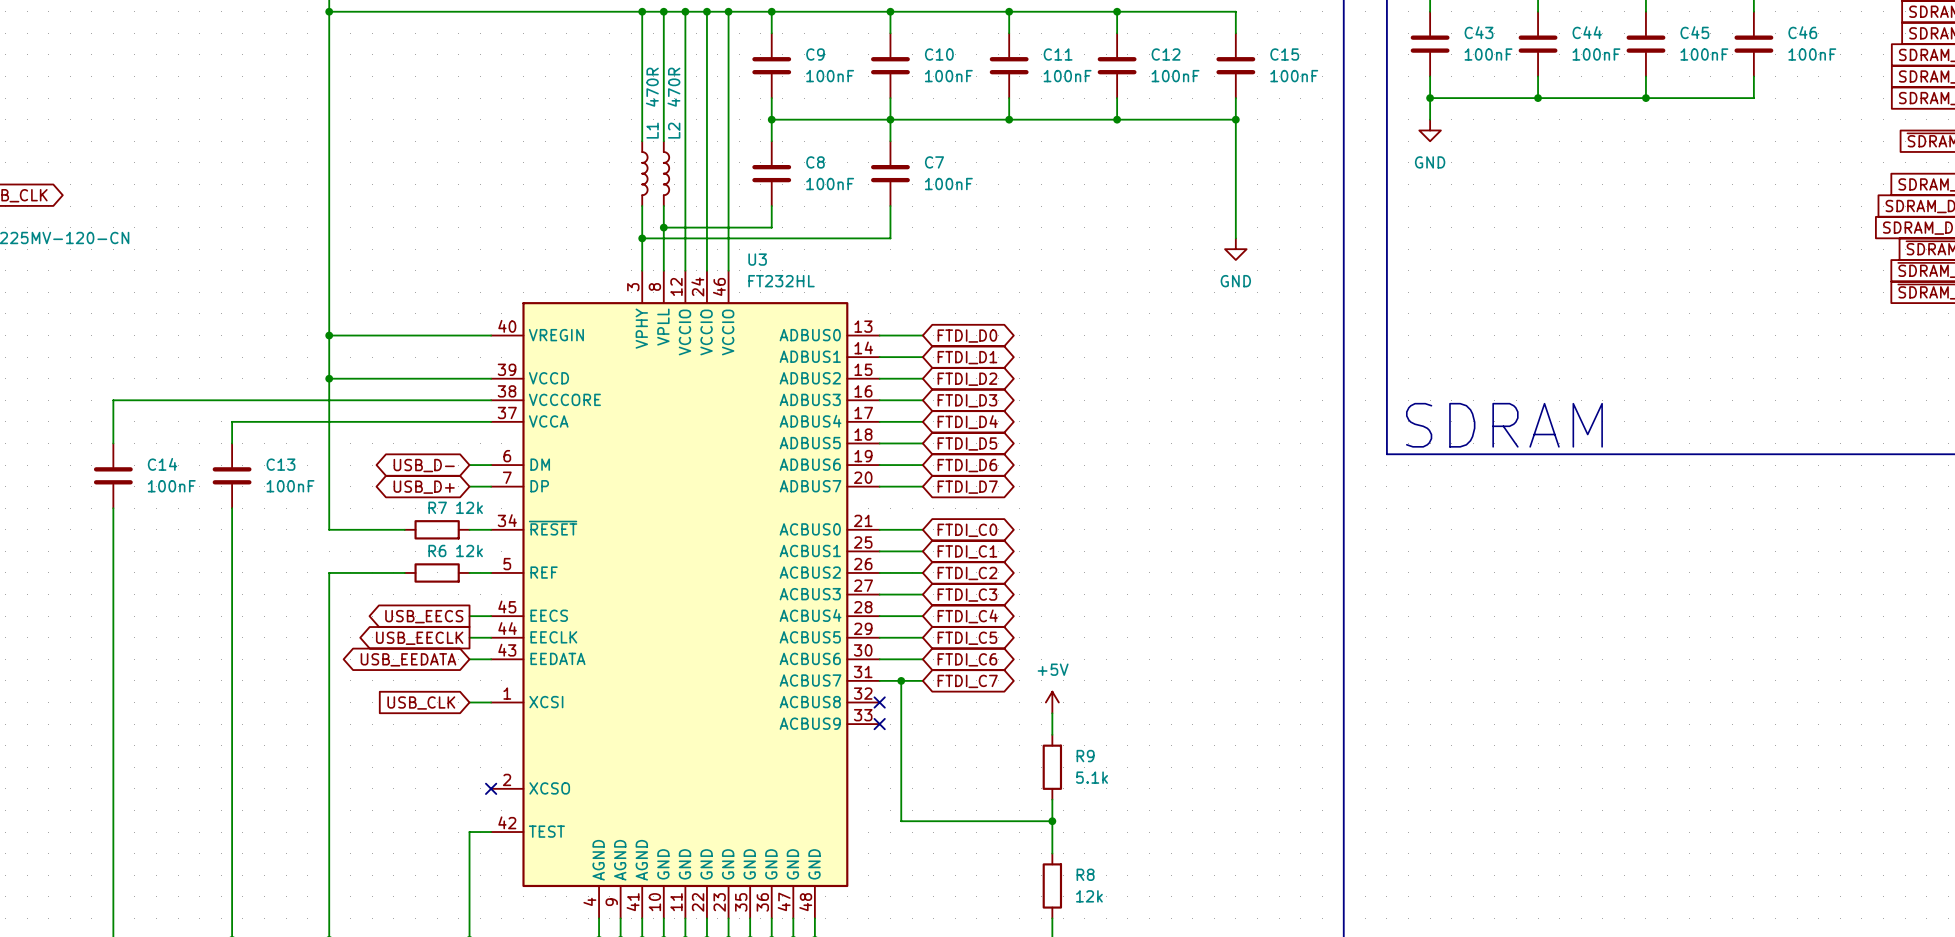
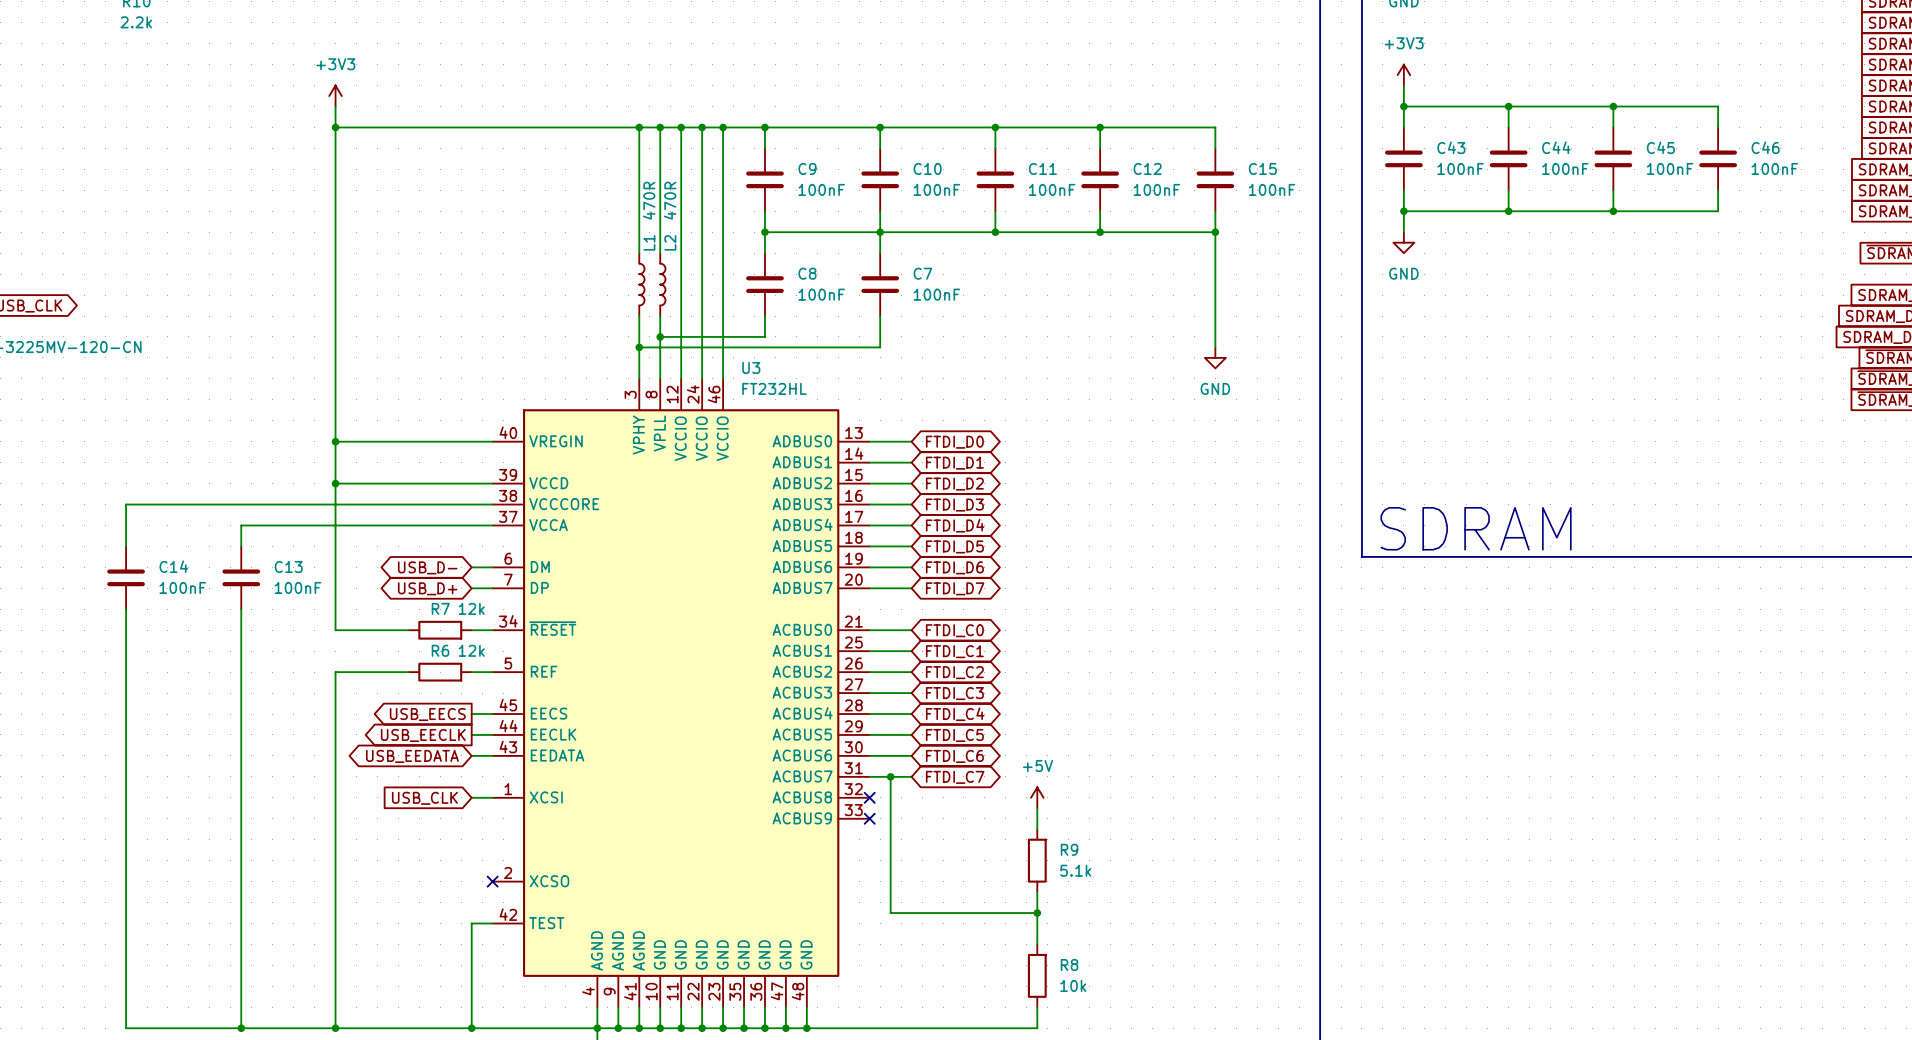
R8 value: 12k (1089, 896) -> 10k (1073, 985)

